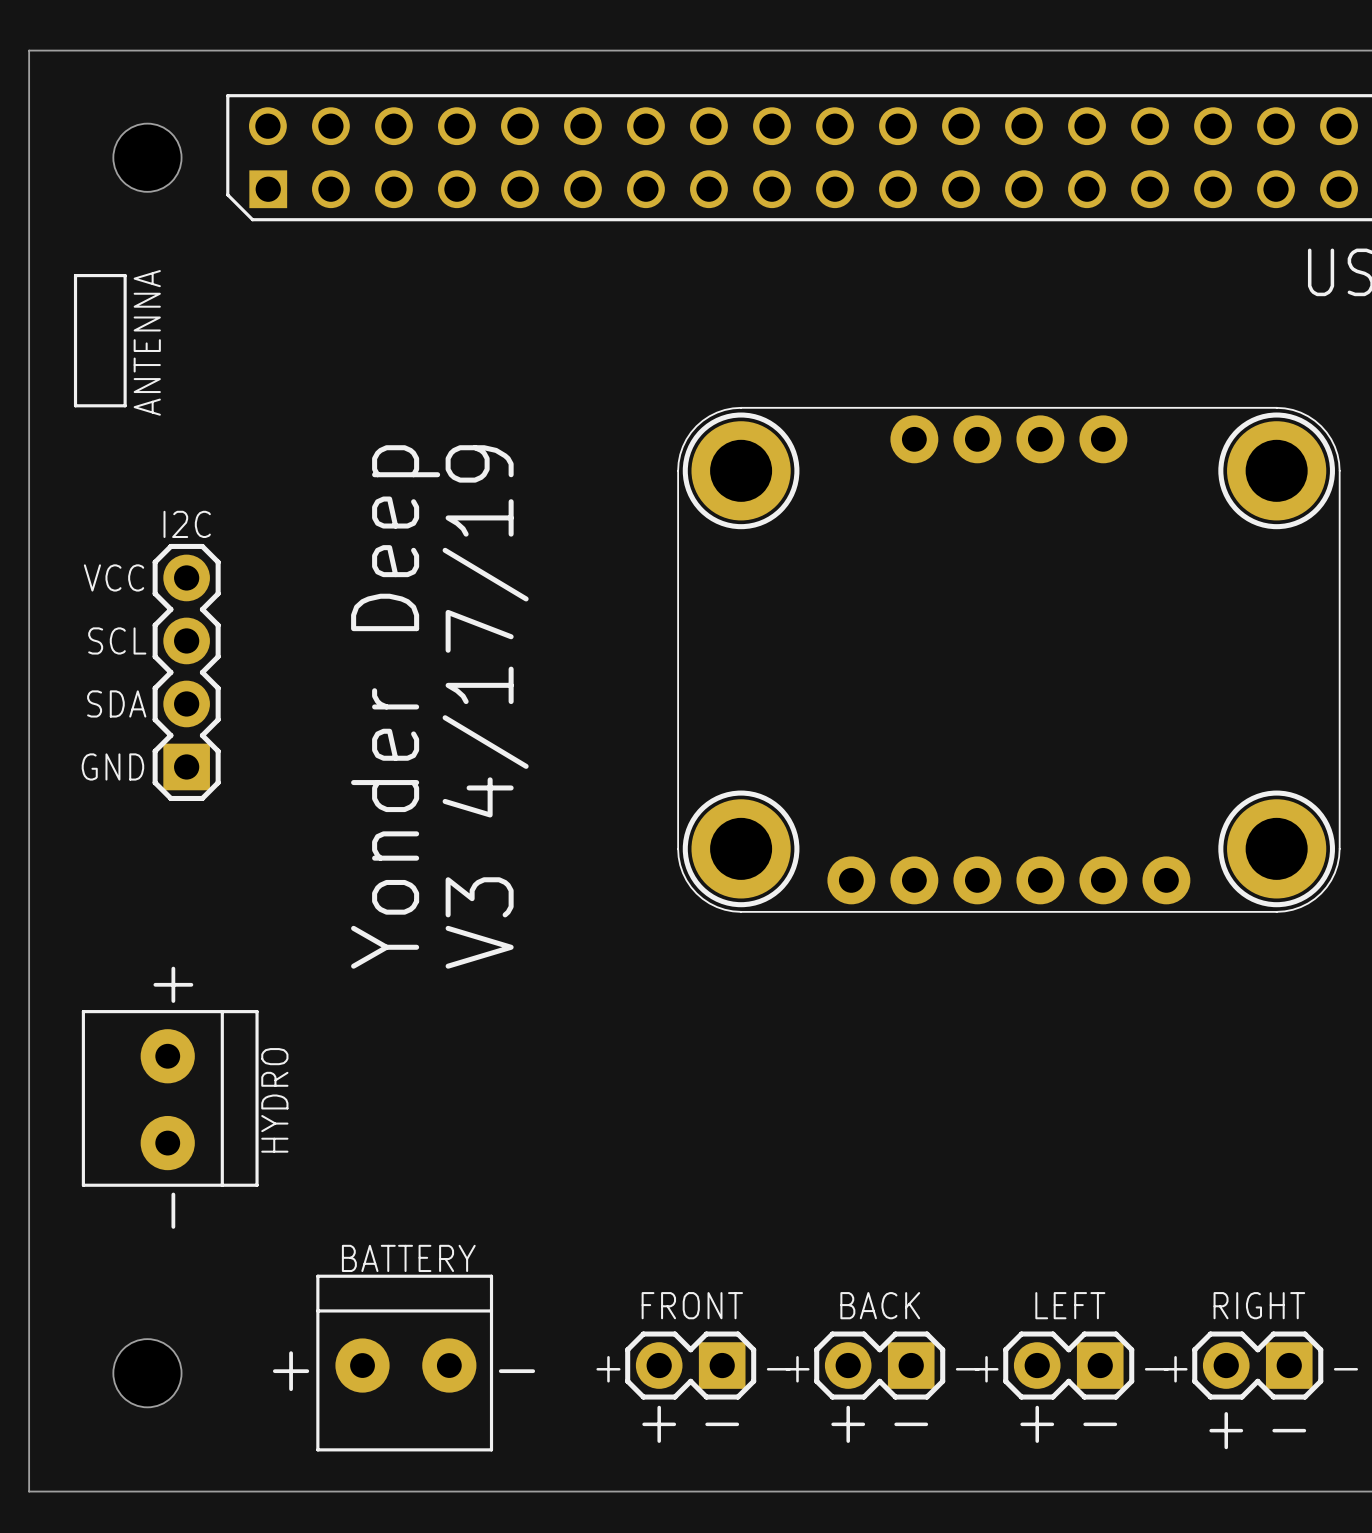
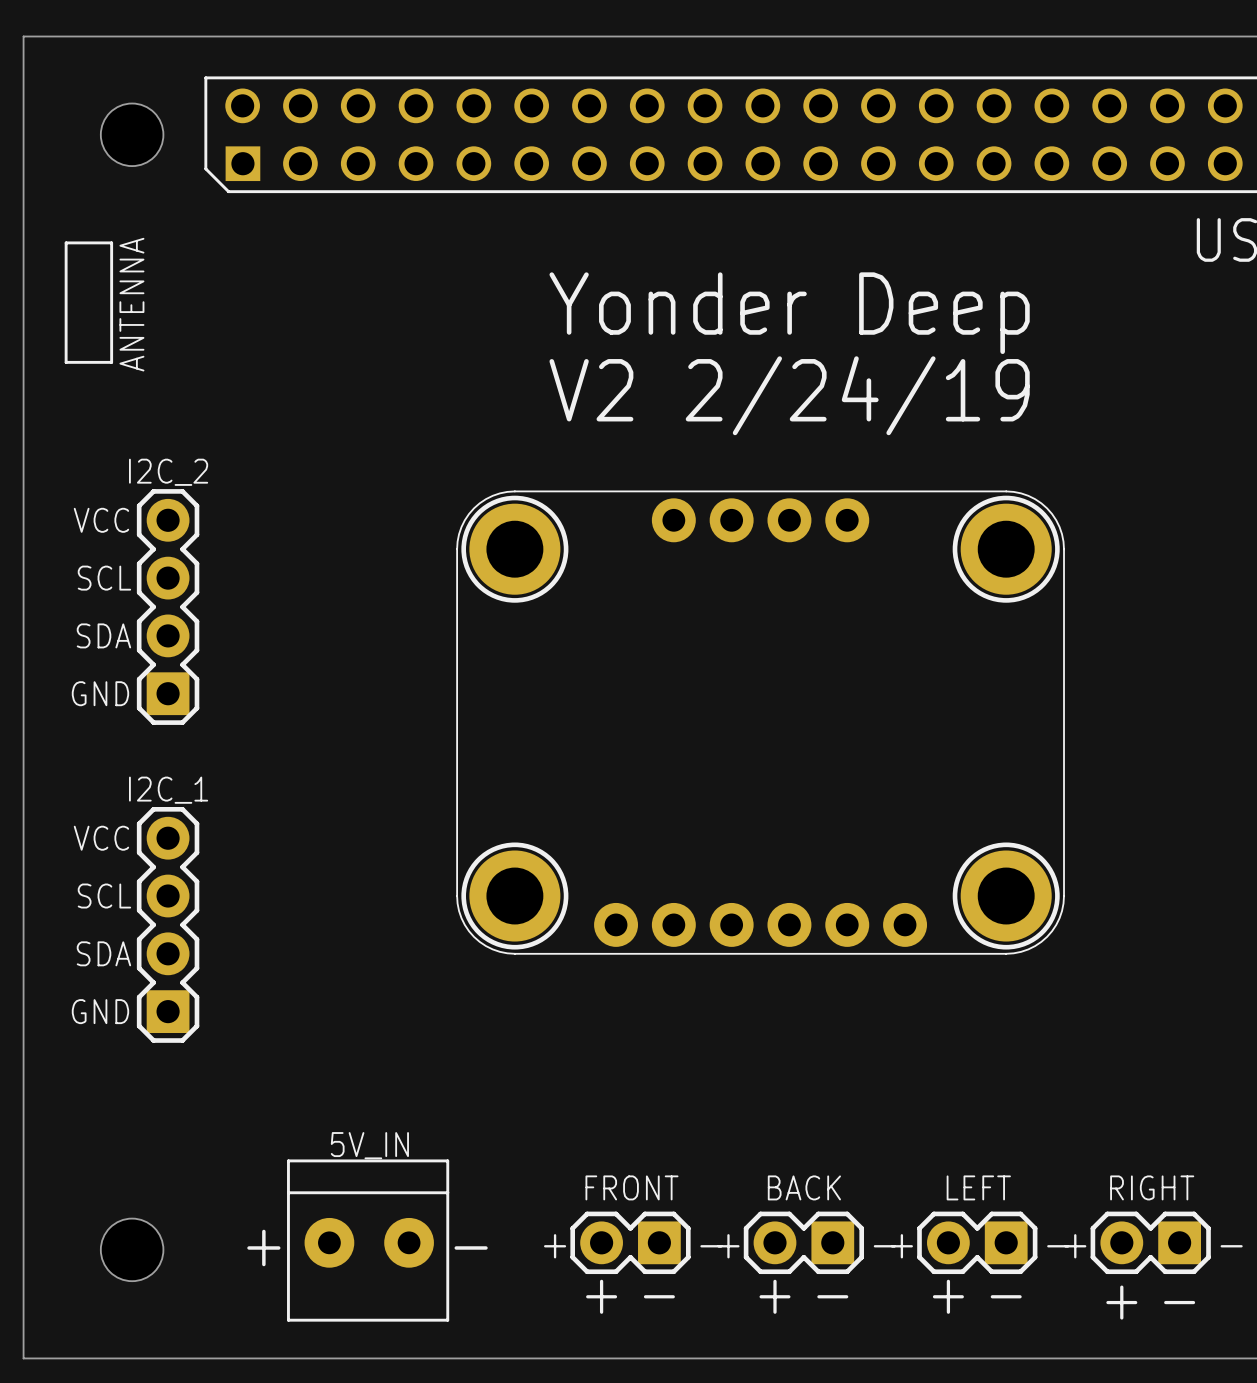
text: none -> Yonder Deep (789, 313)
text: none -> V2 2/24/19 (789, 395)
I2C name: I2C (187, 524) -> I2C_2 (168, 472)
part position: (1008, 659) -> (760, 722)
text: Yonder Deep (395, 706) -> none
text: V3 4/17/19 (485, 706) -> none
I2C_1: none -> (168, 924)
HYDRO: (170, 1098) -> none
BATTERY name: BATTERY (408, 1258) -> 5V_IN (369, 1145)

